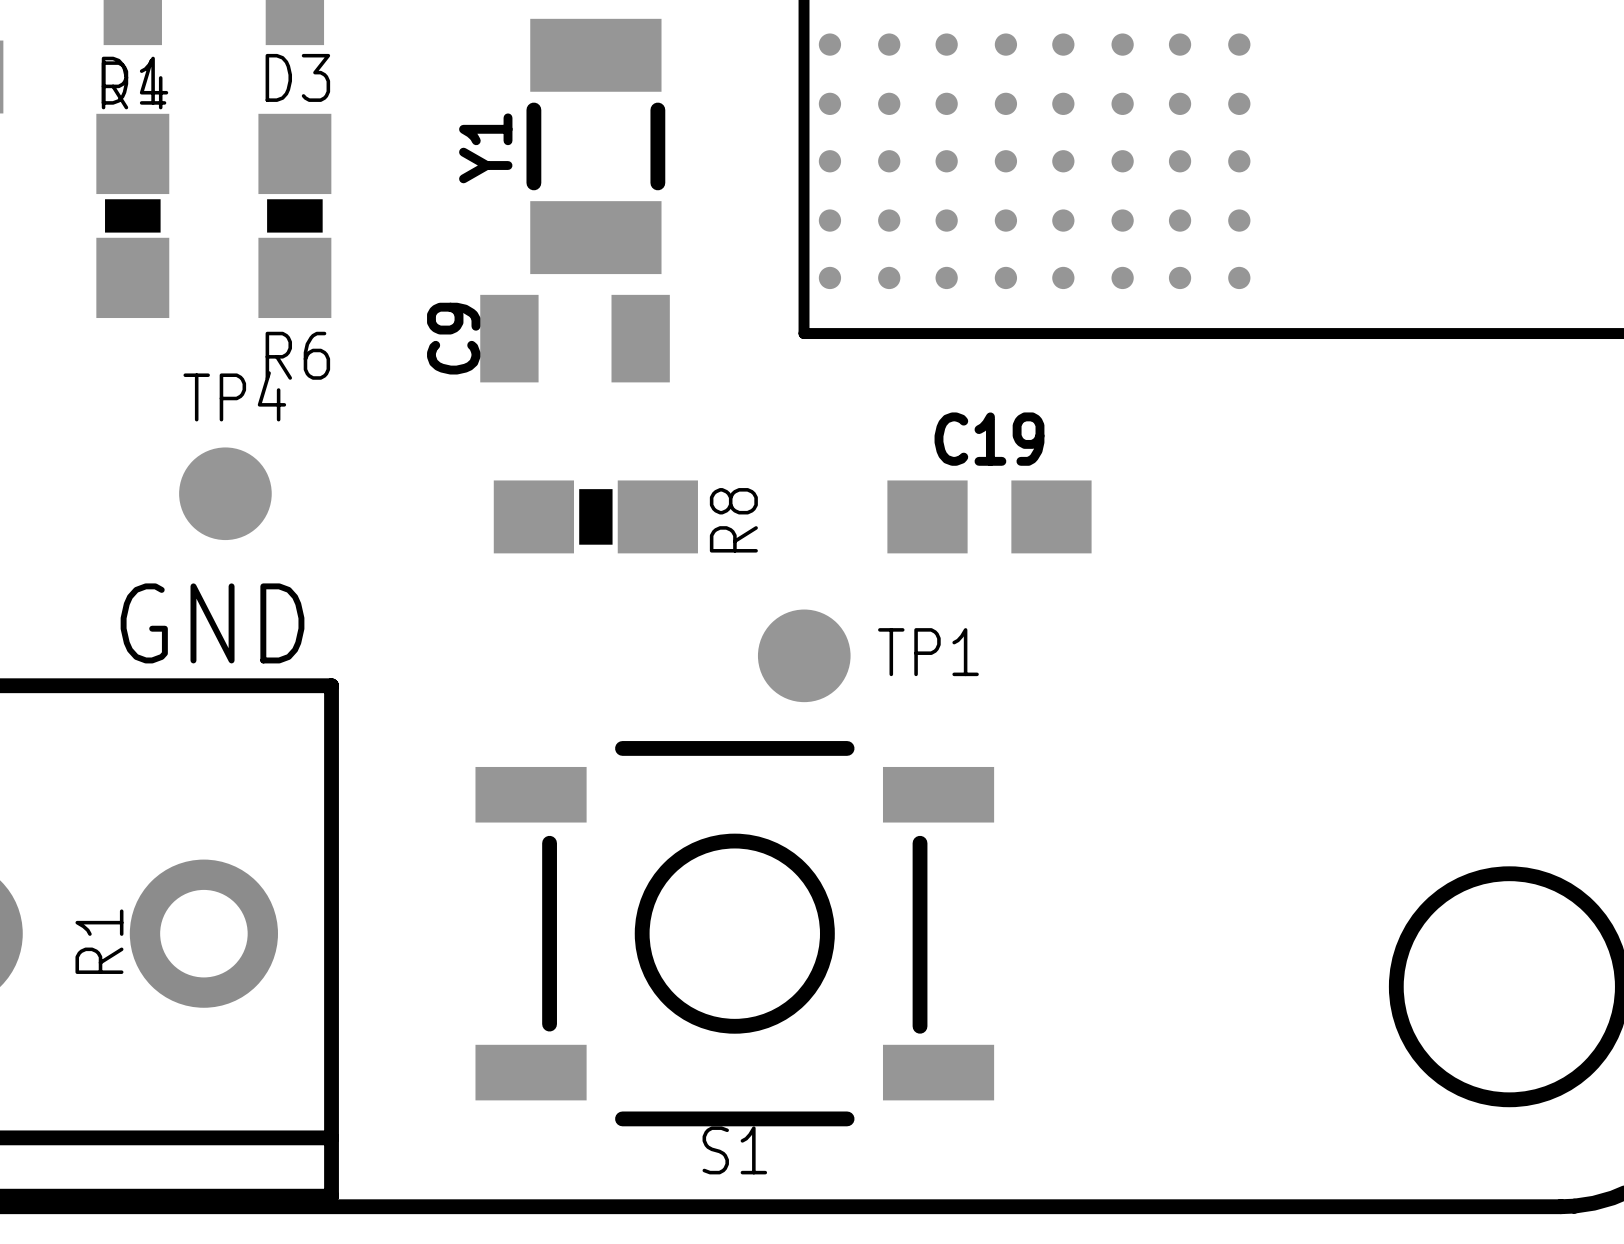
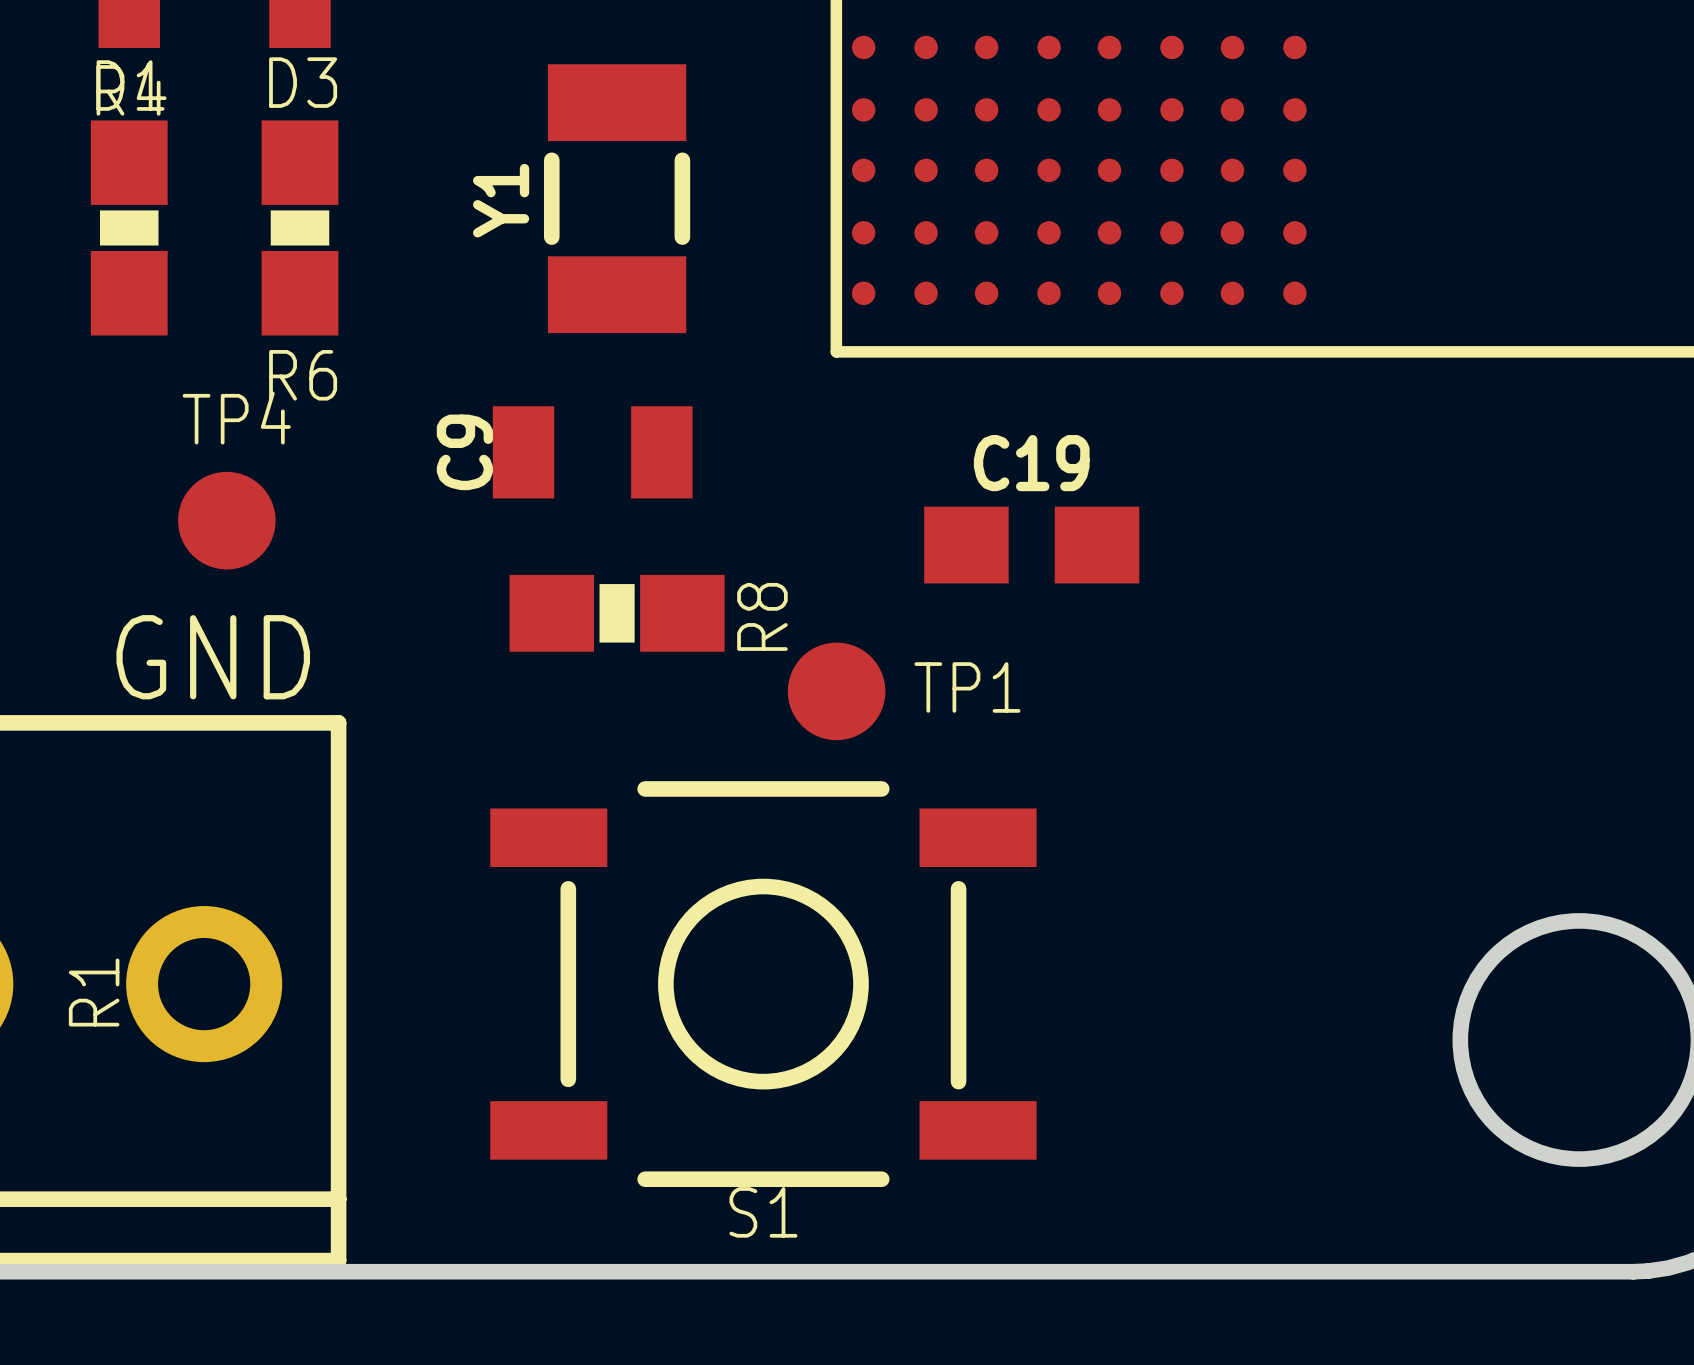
Y1 position: (595, 146) -> (617, 198)
C9 position: (575, 338) -> (592, 452)
R8 position: (595, 516) -> (617, 613)

